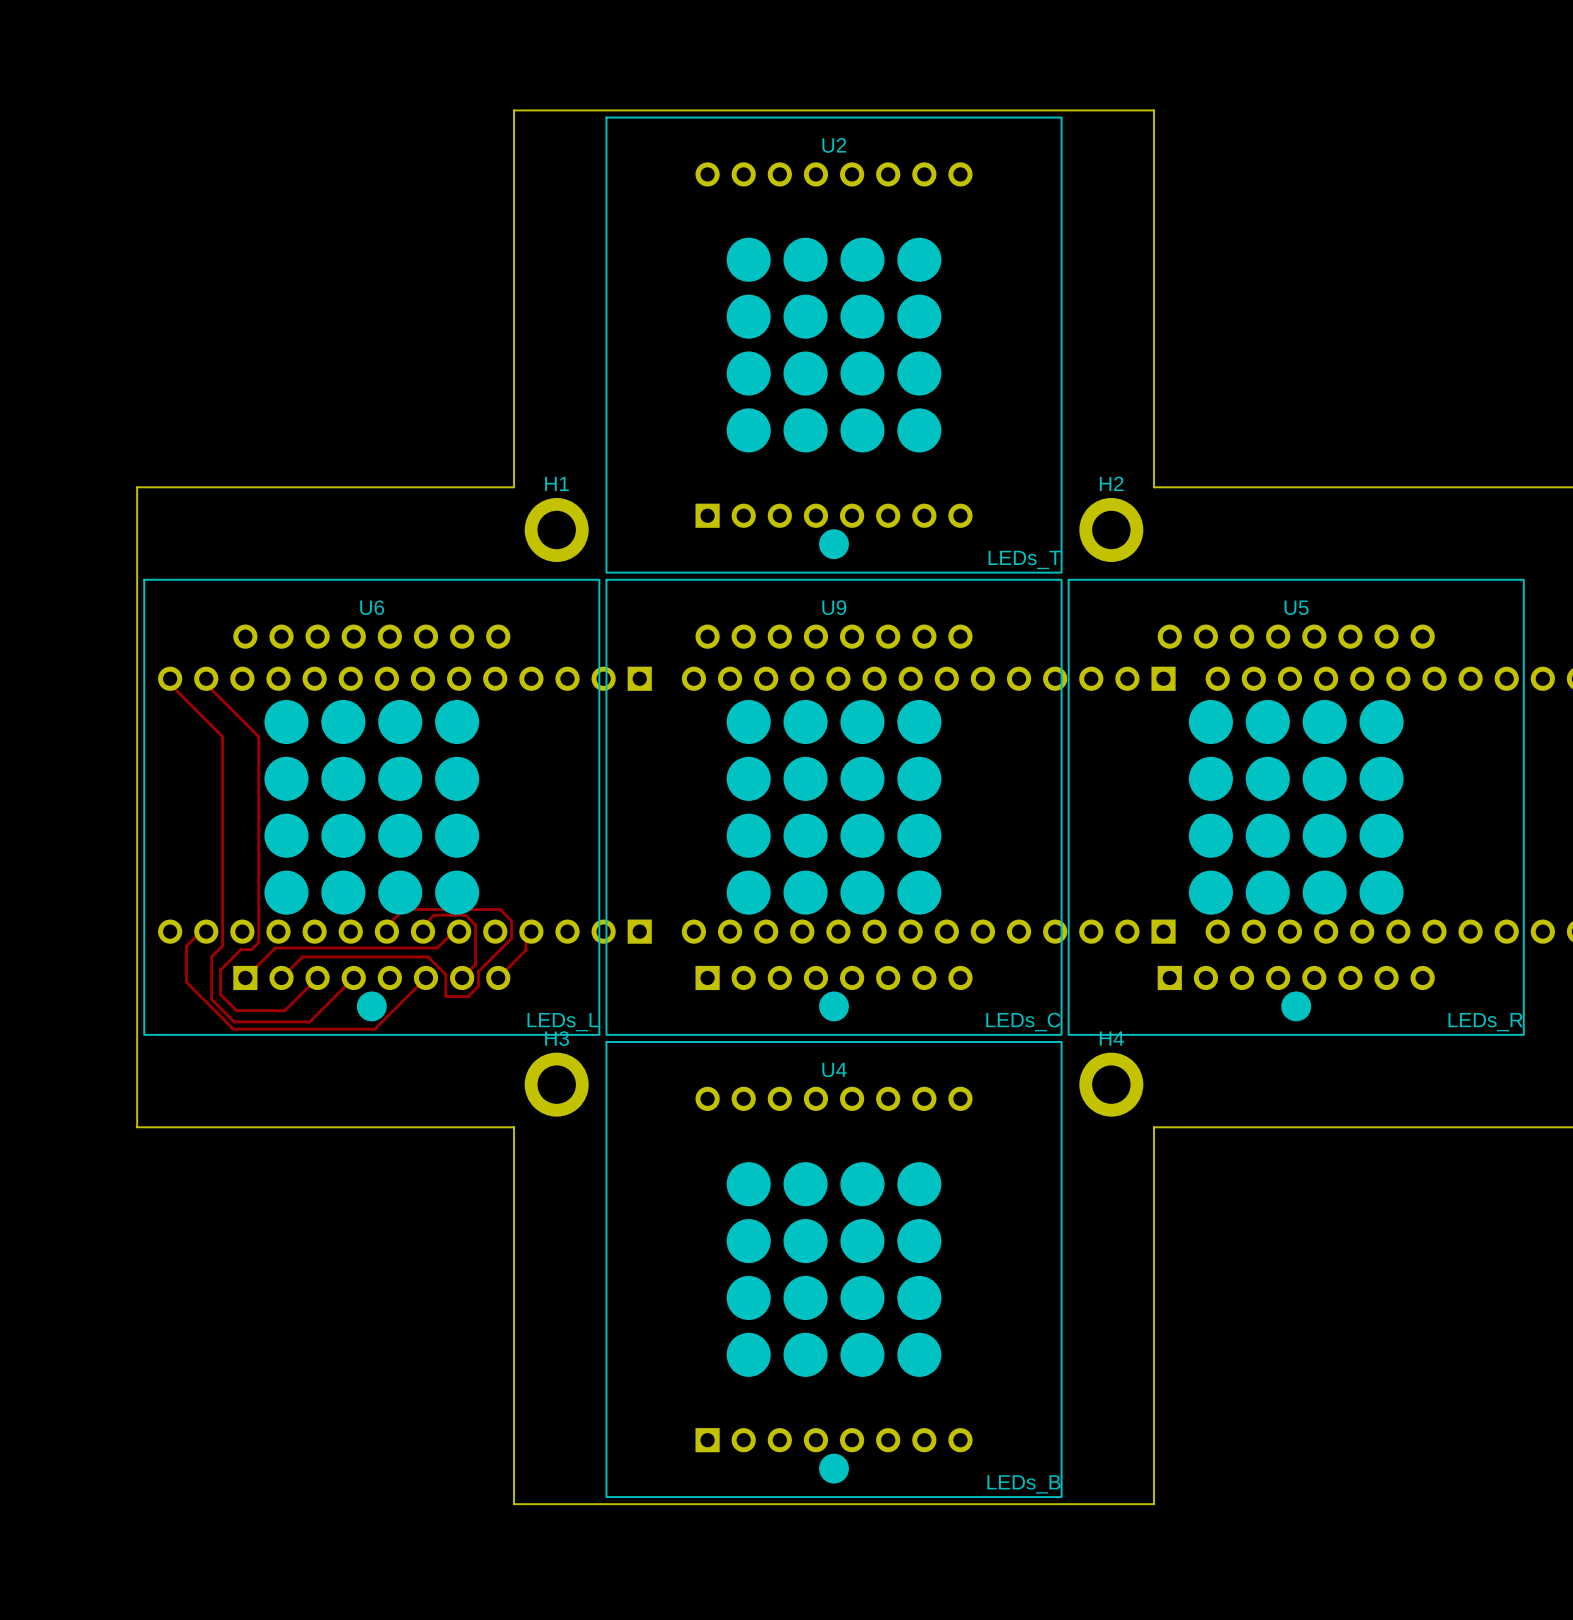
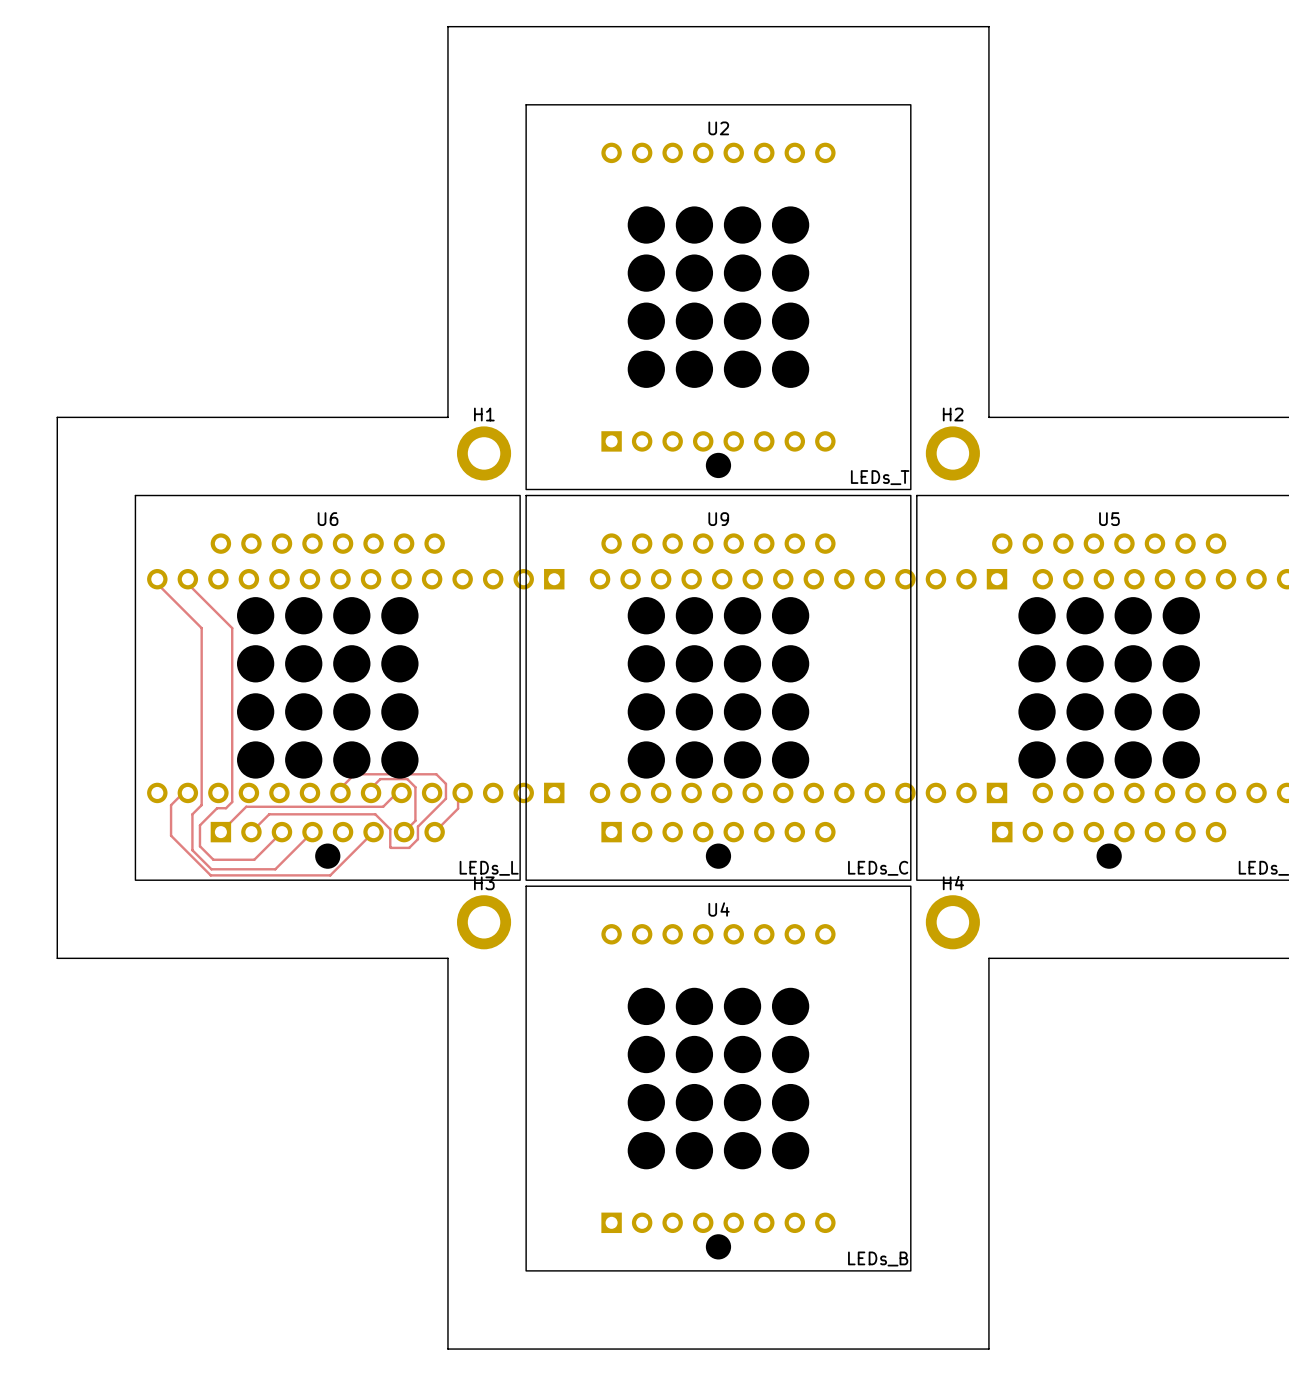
board edge: (514, 110) (1154, 110) -> (447, 98) (447, 26) (988, 26) (988, 98)
board edge: (137, 487) (137, 1127) -> (129, 417) (57, 417) (57, 958) (129, 958)
board edge: (514, 1504) (1154, 1504) -> (447, 1276) (447, 1349) (988, 1349) (988, 1276)

